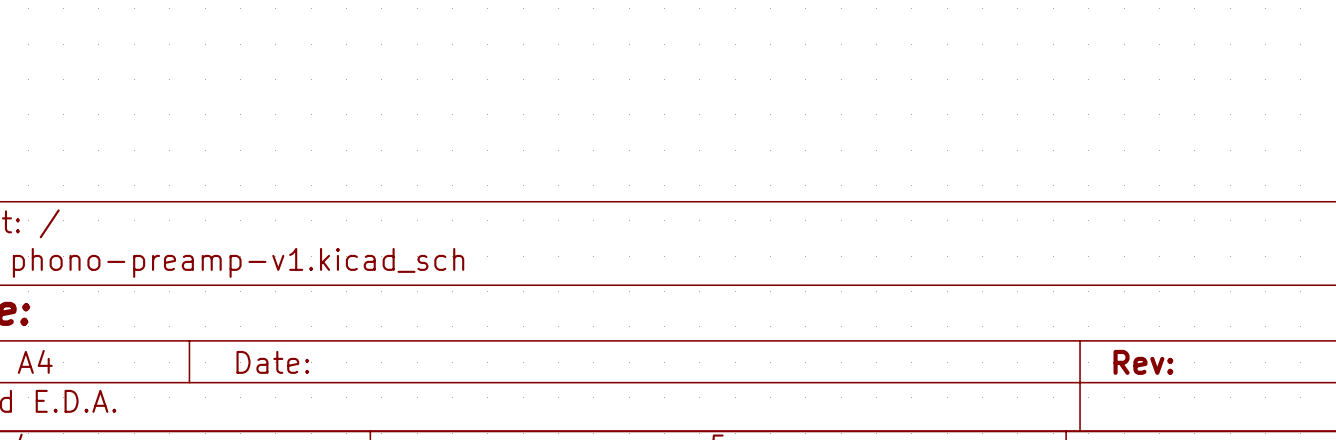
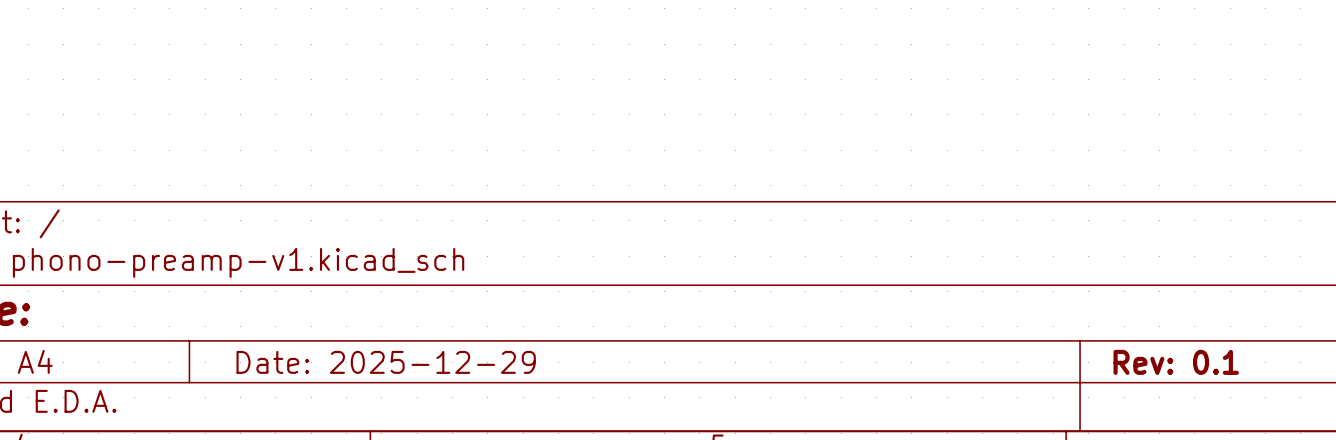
title block: Date: (272, 362) -> Date: 2025-12-29 (386, 362)
title block: Rev: (1143, 362) -> Rev: 0.1 (1176, 362)

